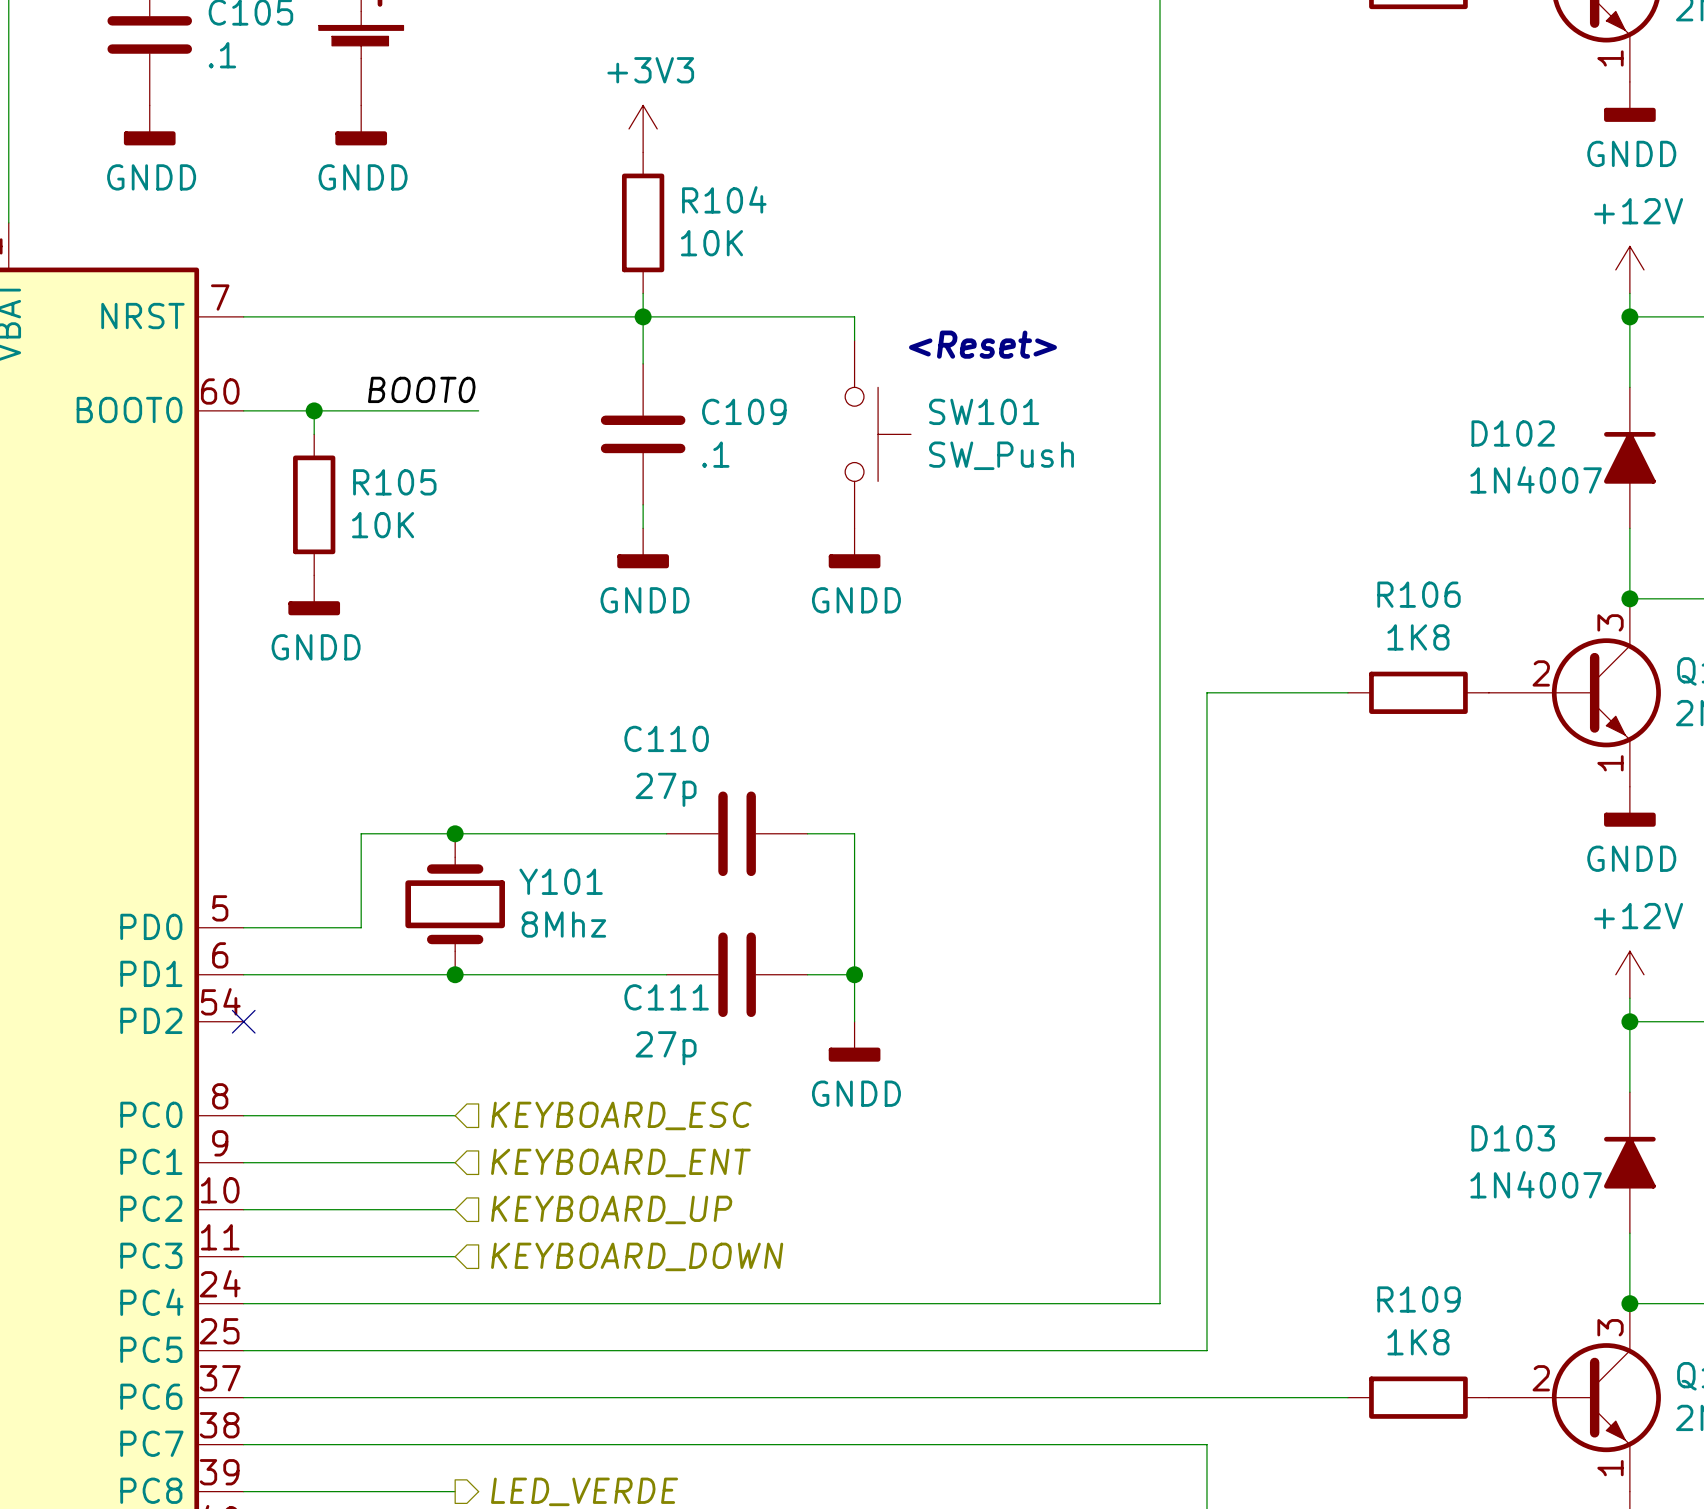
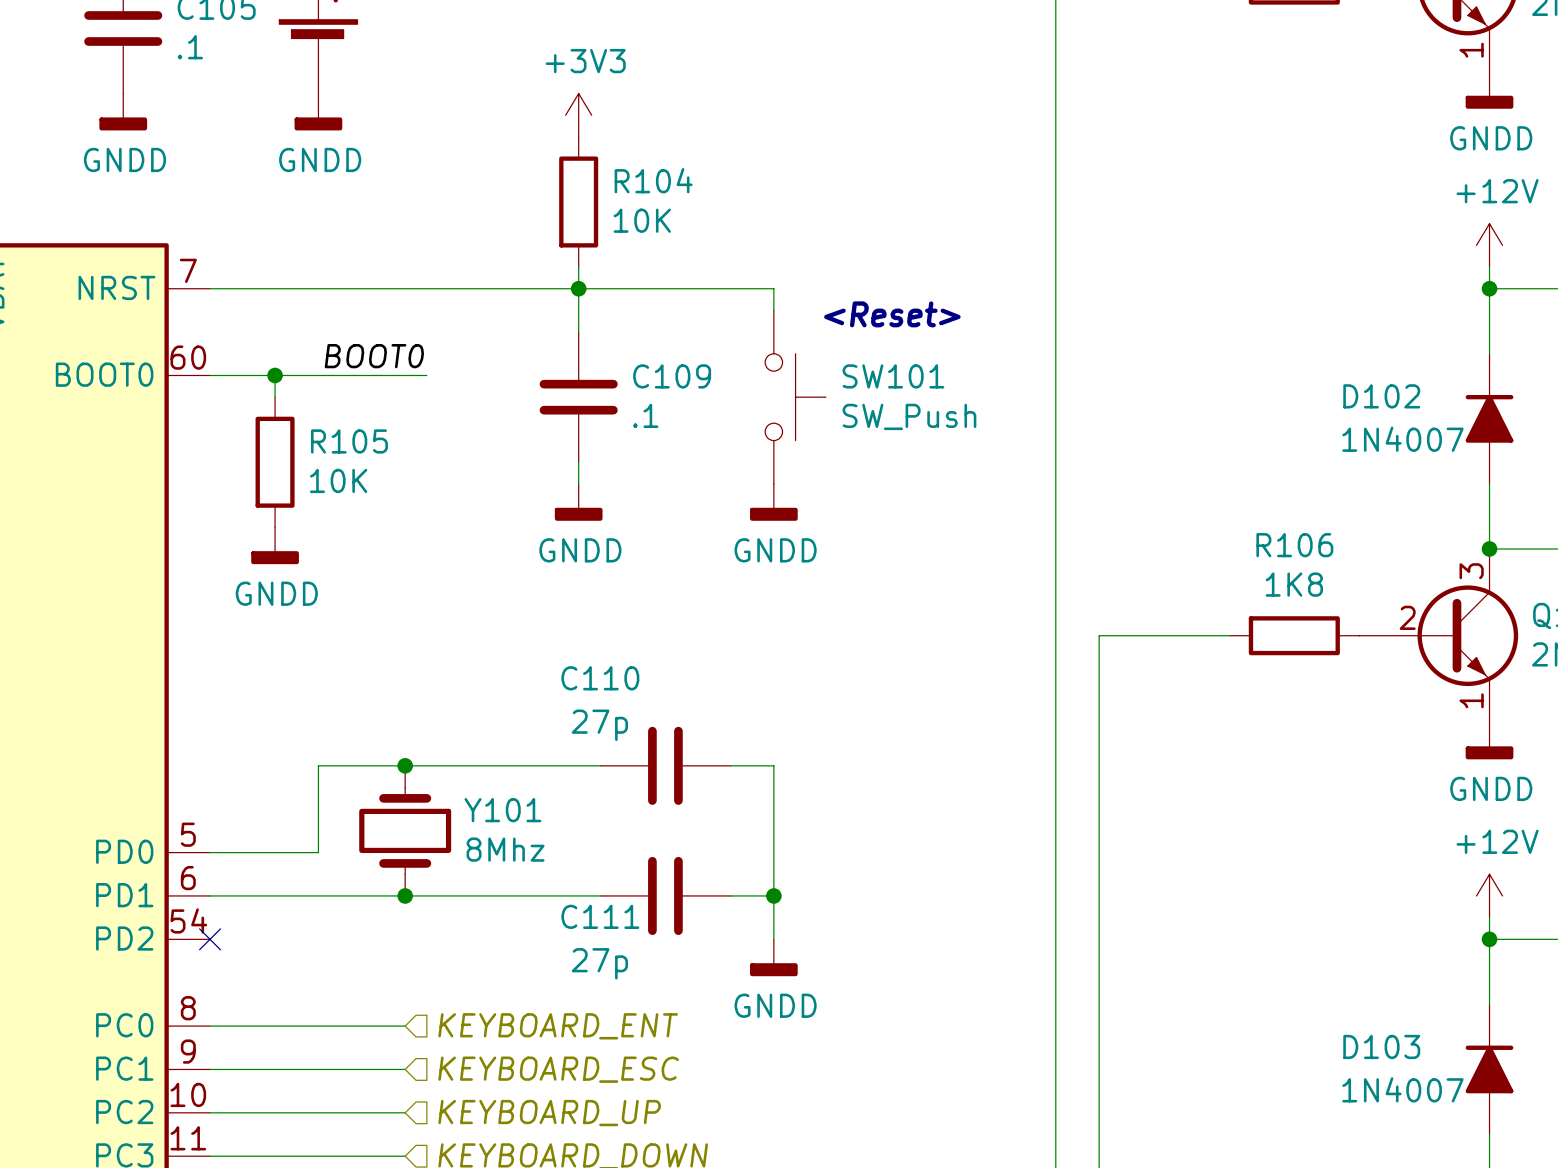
hierarchical label: KEYBOARD_ESC (621, 1115) -> KEYBOARD_ENT (558, 1026)
hierarchical label: KEYBOARD_ENT (620, 1162) -> KEYBOARD_ESC (558, 1069)

